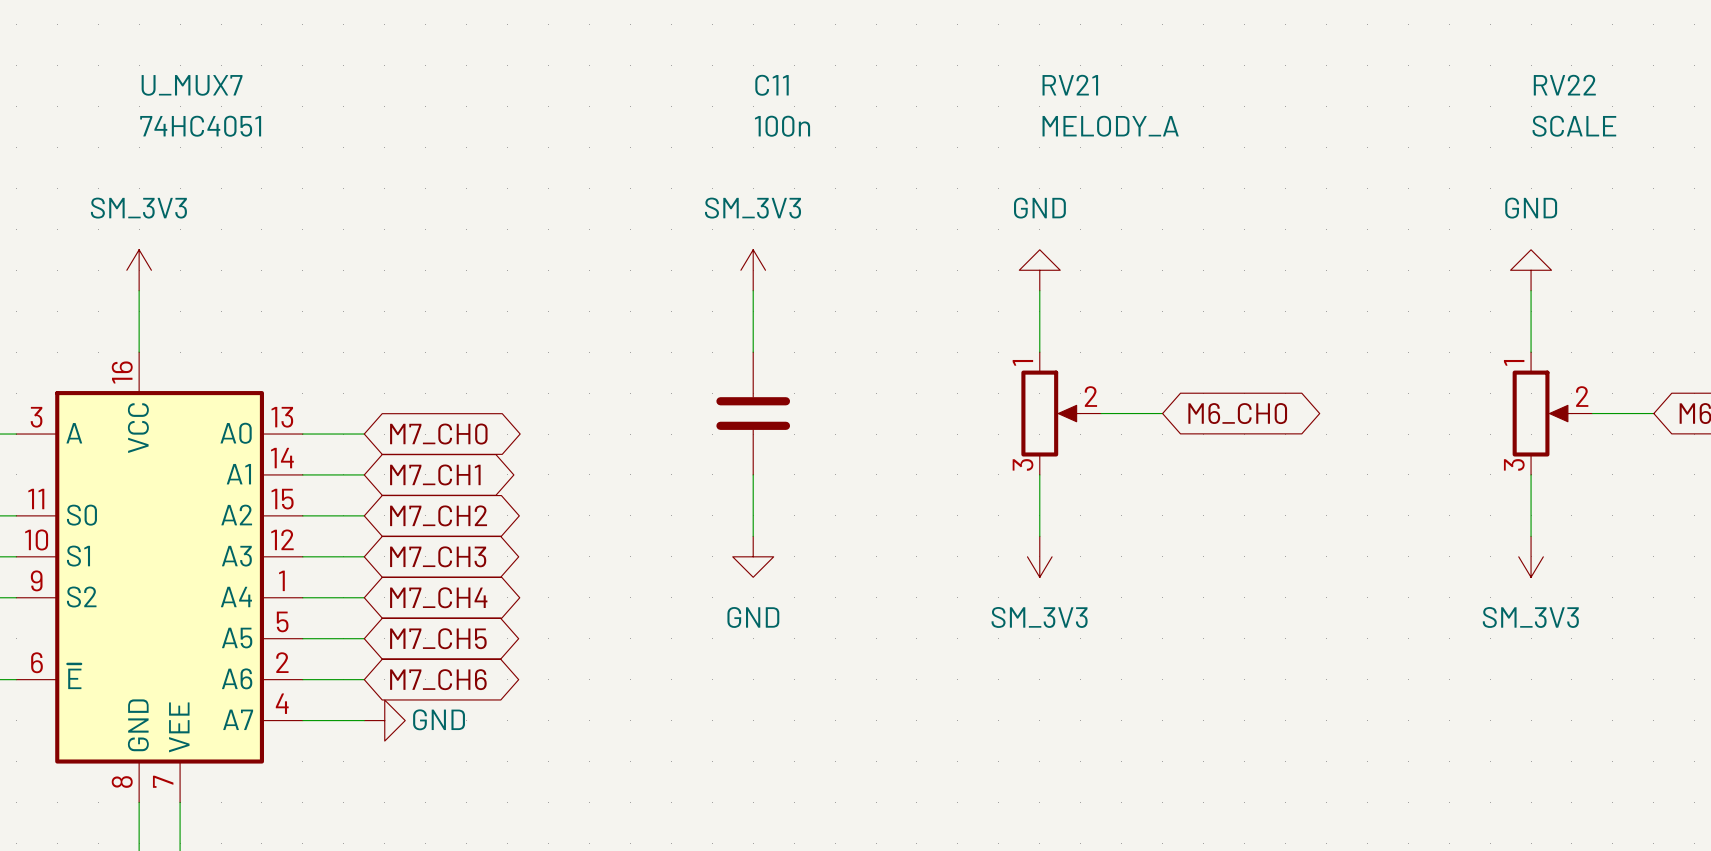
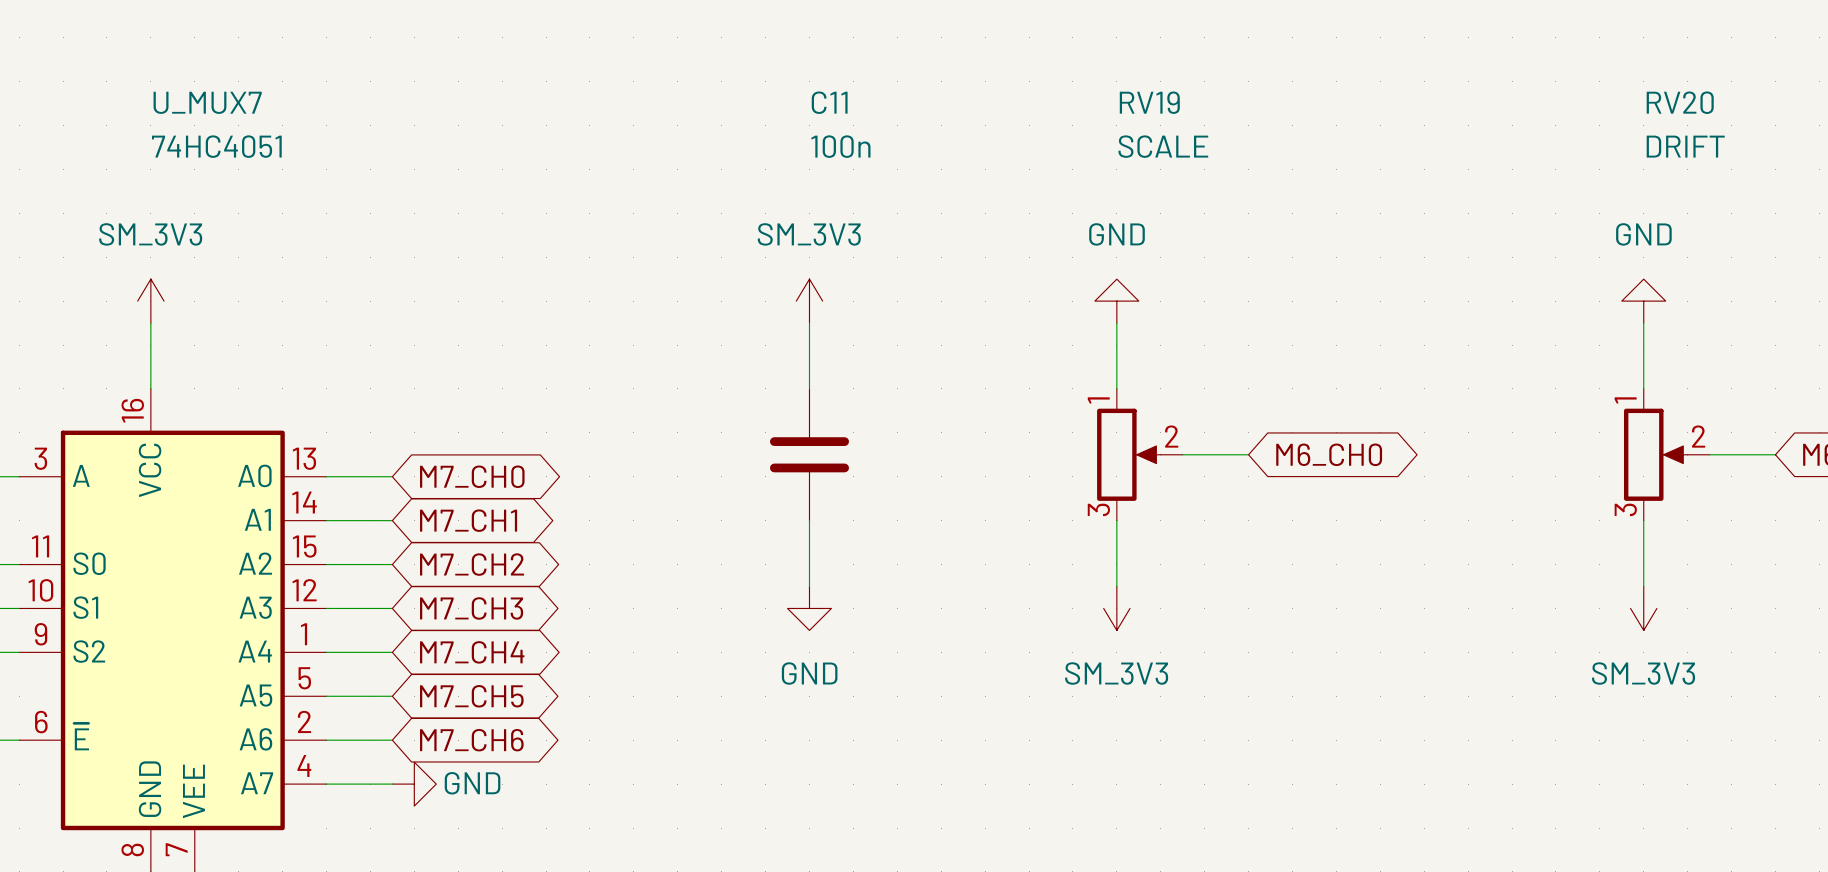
RV21 name: RV21 (1070, 85) -> RV19 (1149, 102)
RV22 name: RV22 (1564, 85) -> RV20 (1680, 102)
RV21 value: MELODY_A (1110, 126) -> SCALE (1163, 146)
RV22 value: SCALE (1574, 126) -> DRIFT (1685, 146)

